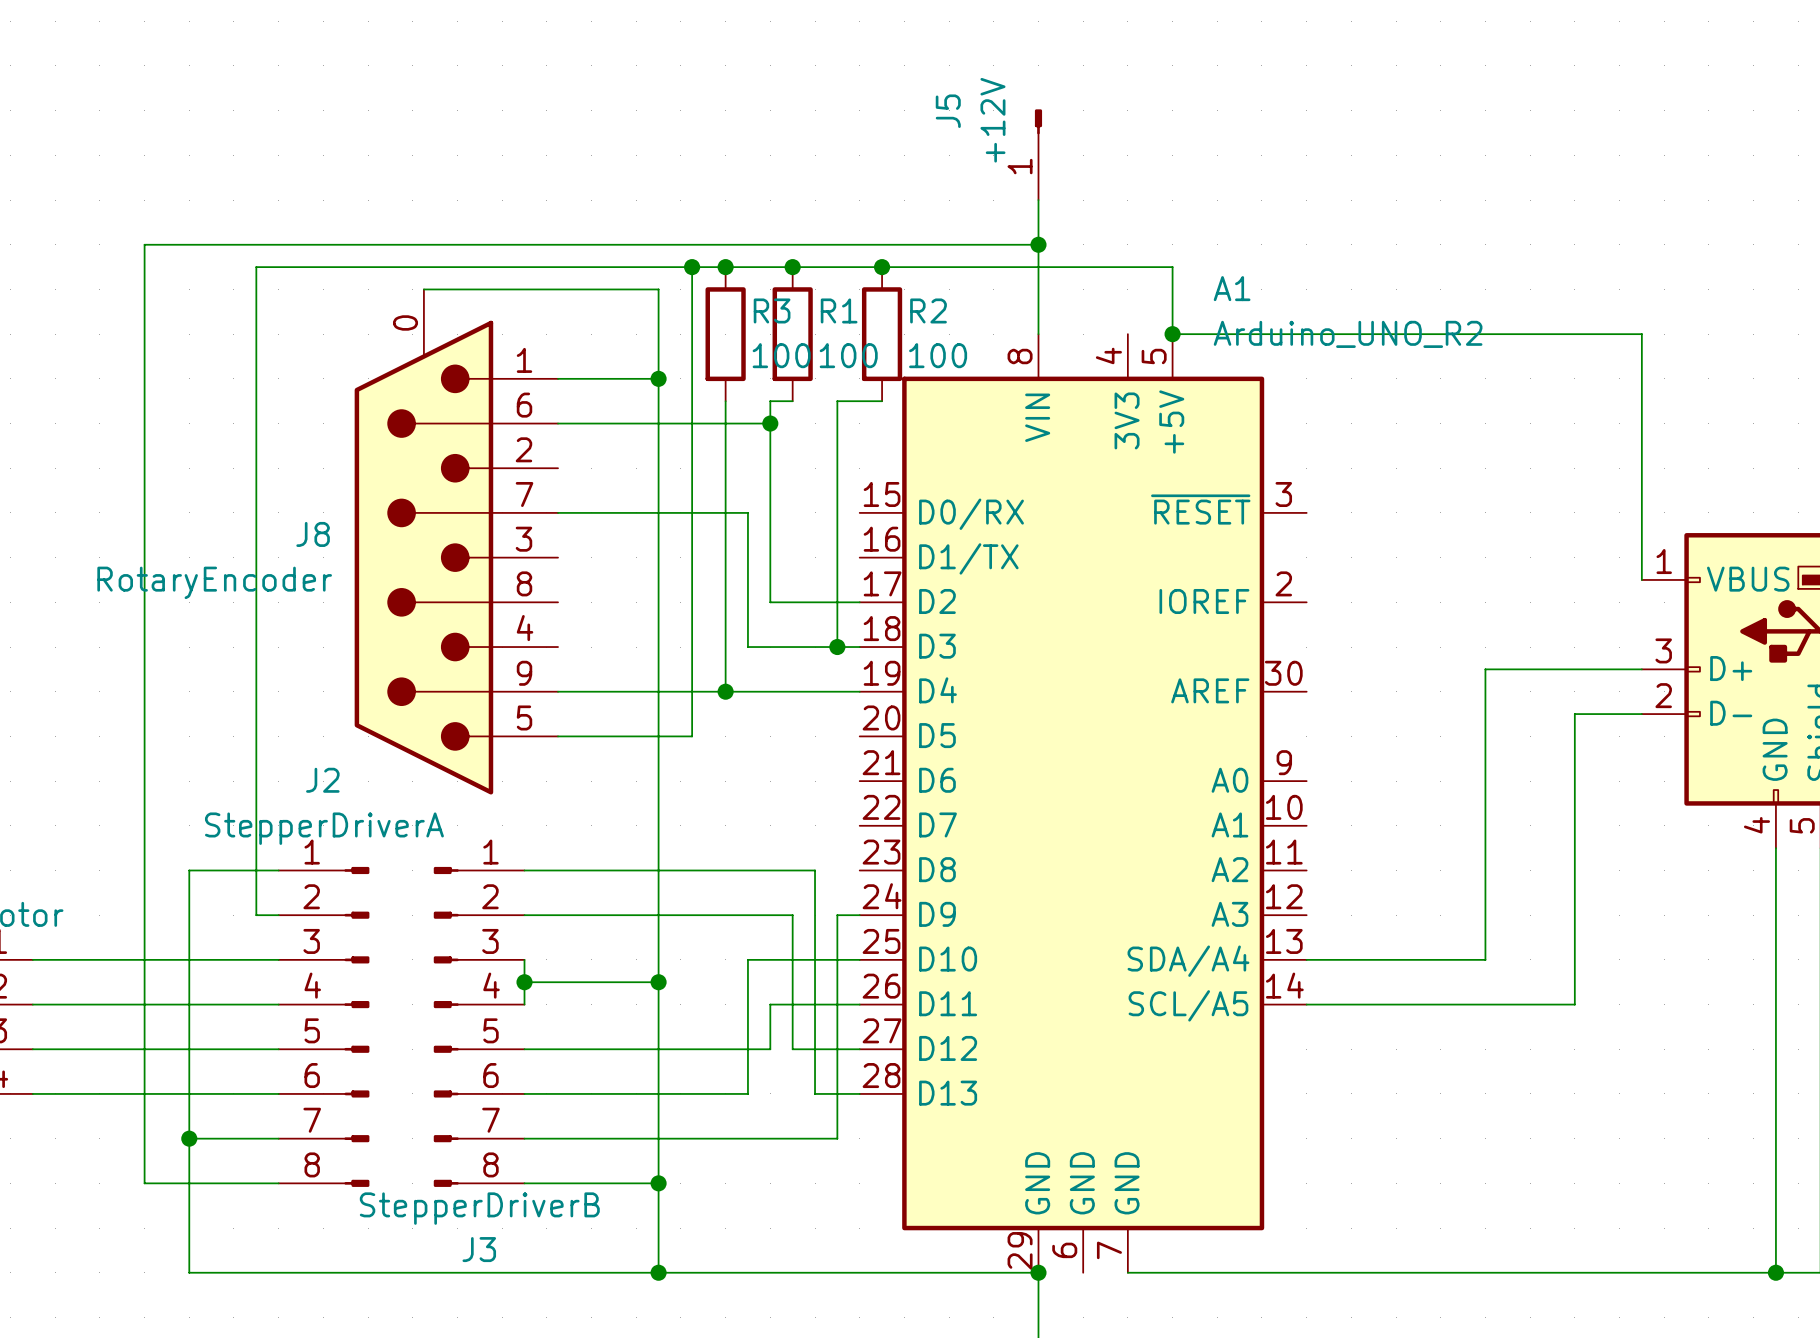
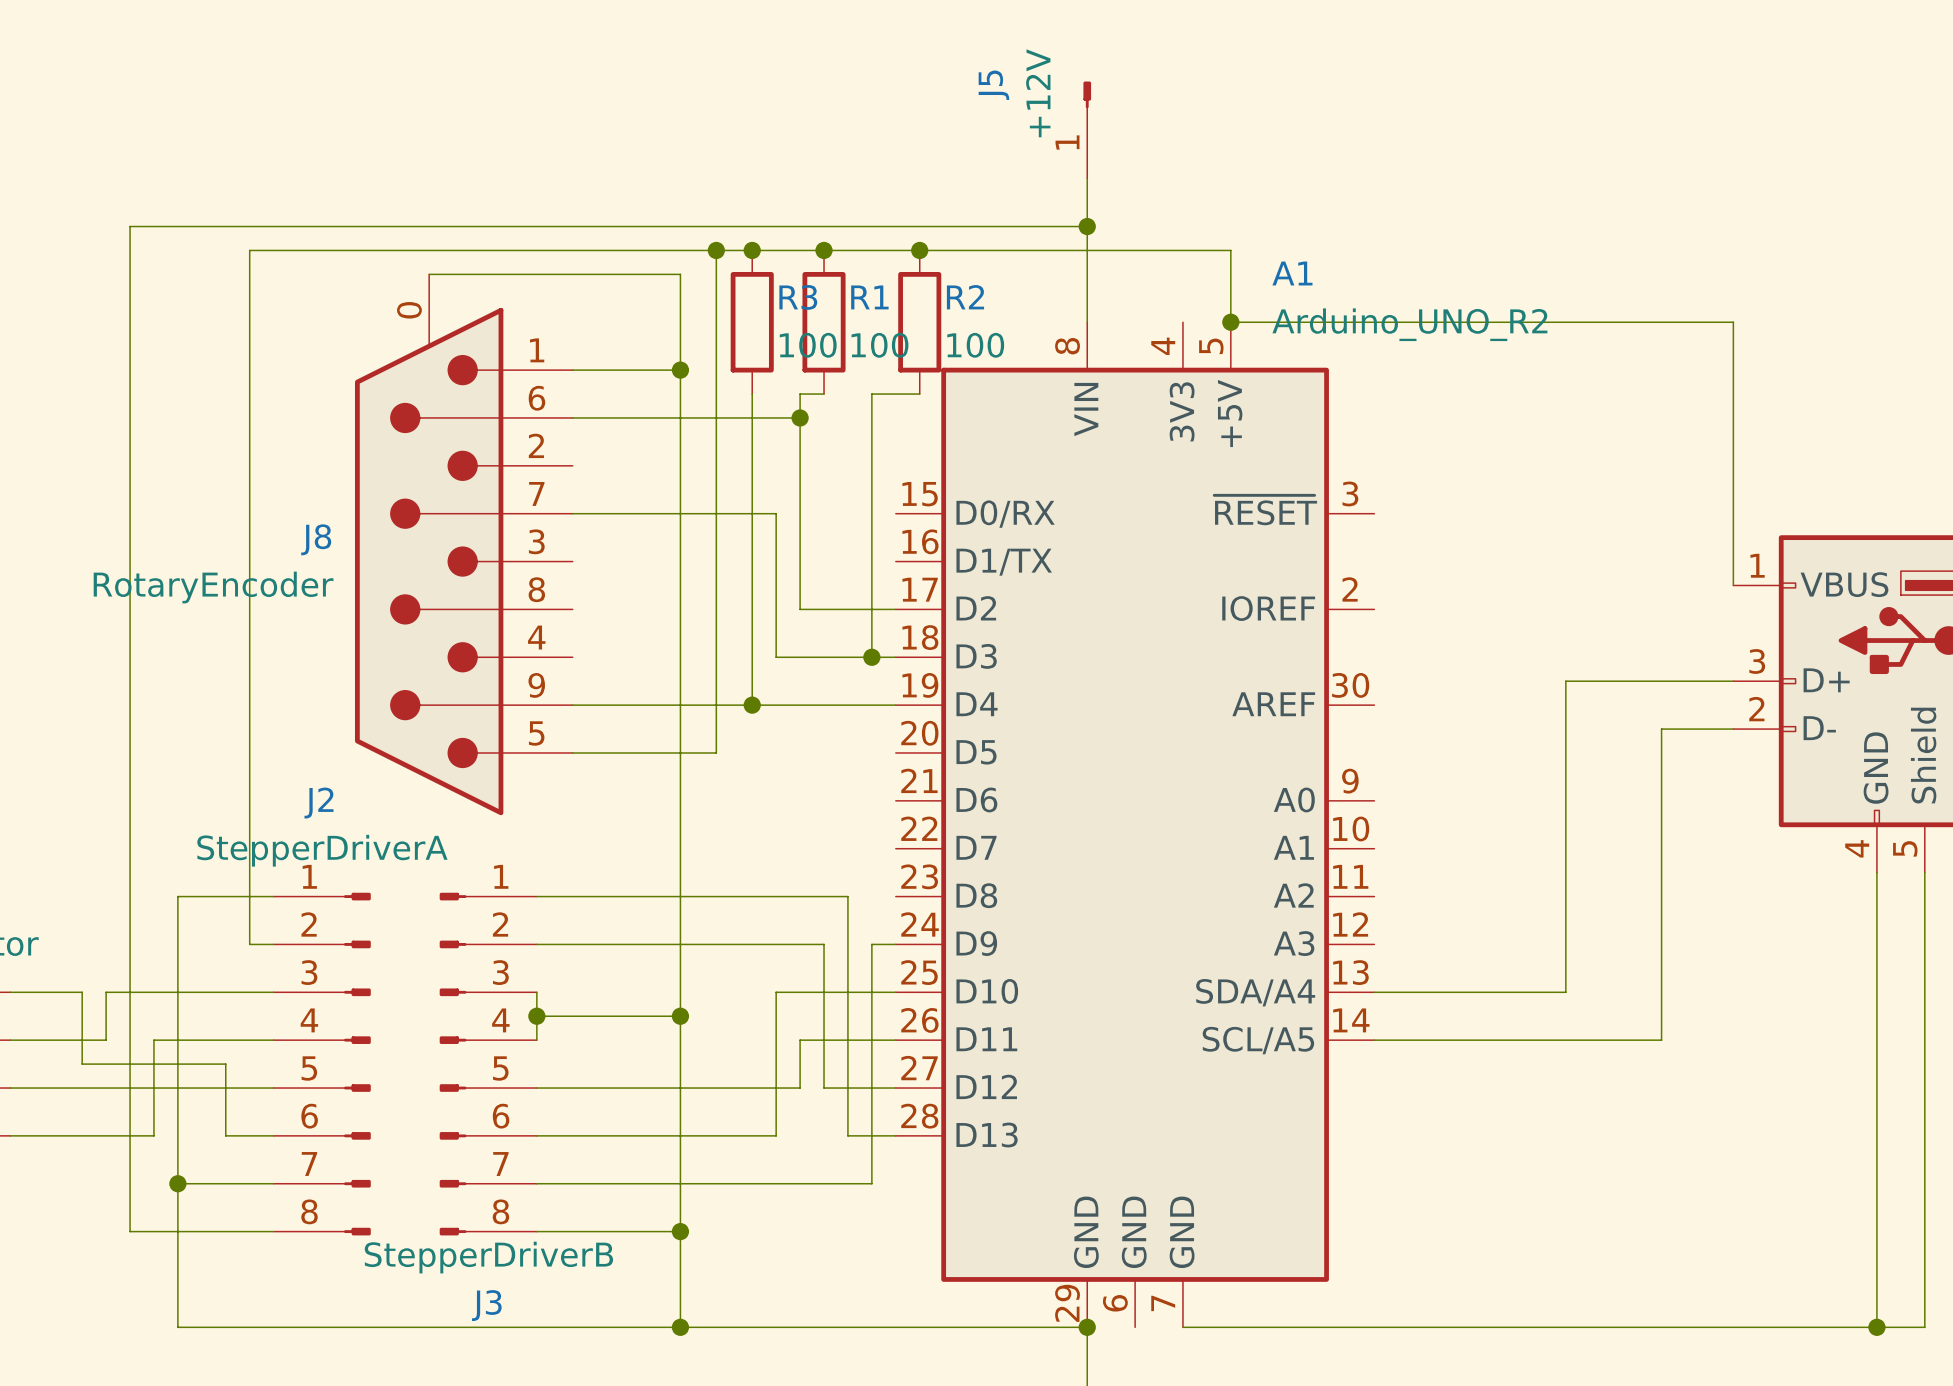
wire: (99, 959) (122, 959) -> (106, 1040) (106, 992)
wire: (122, 1004) (166, 1004) -> (153, 1135) (153, 1040)
wire: (166, 1093) (233, 1093) -> (82, 992) (82, 1064) (225, 1064) (225, 1135)

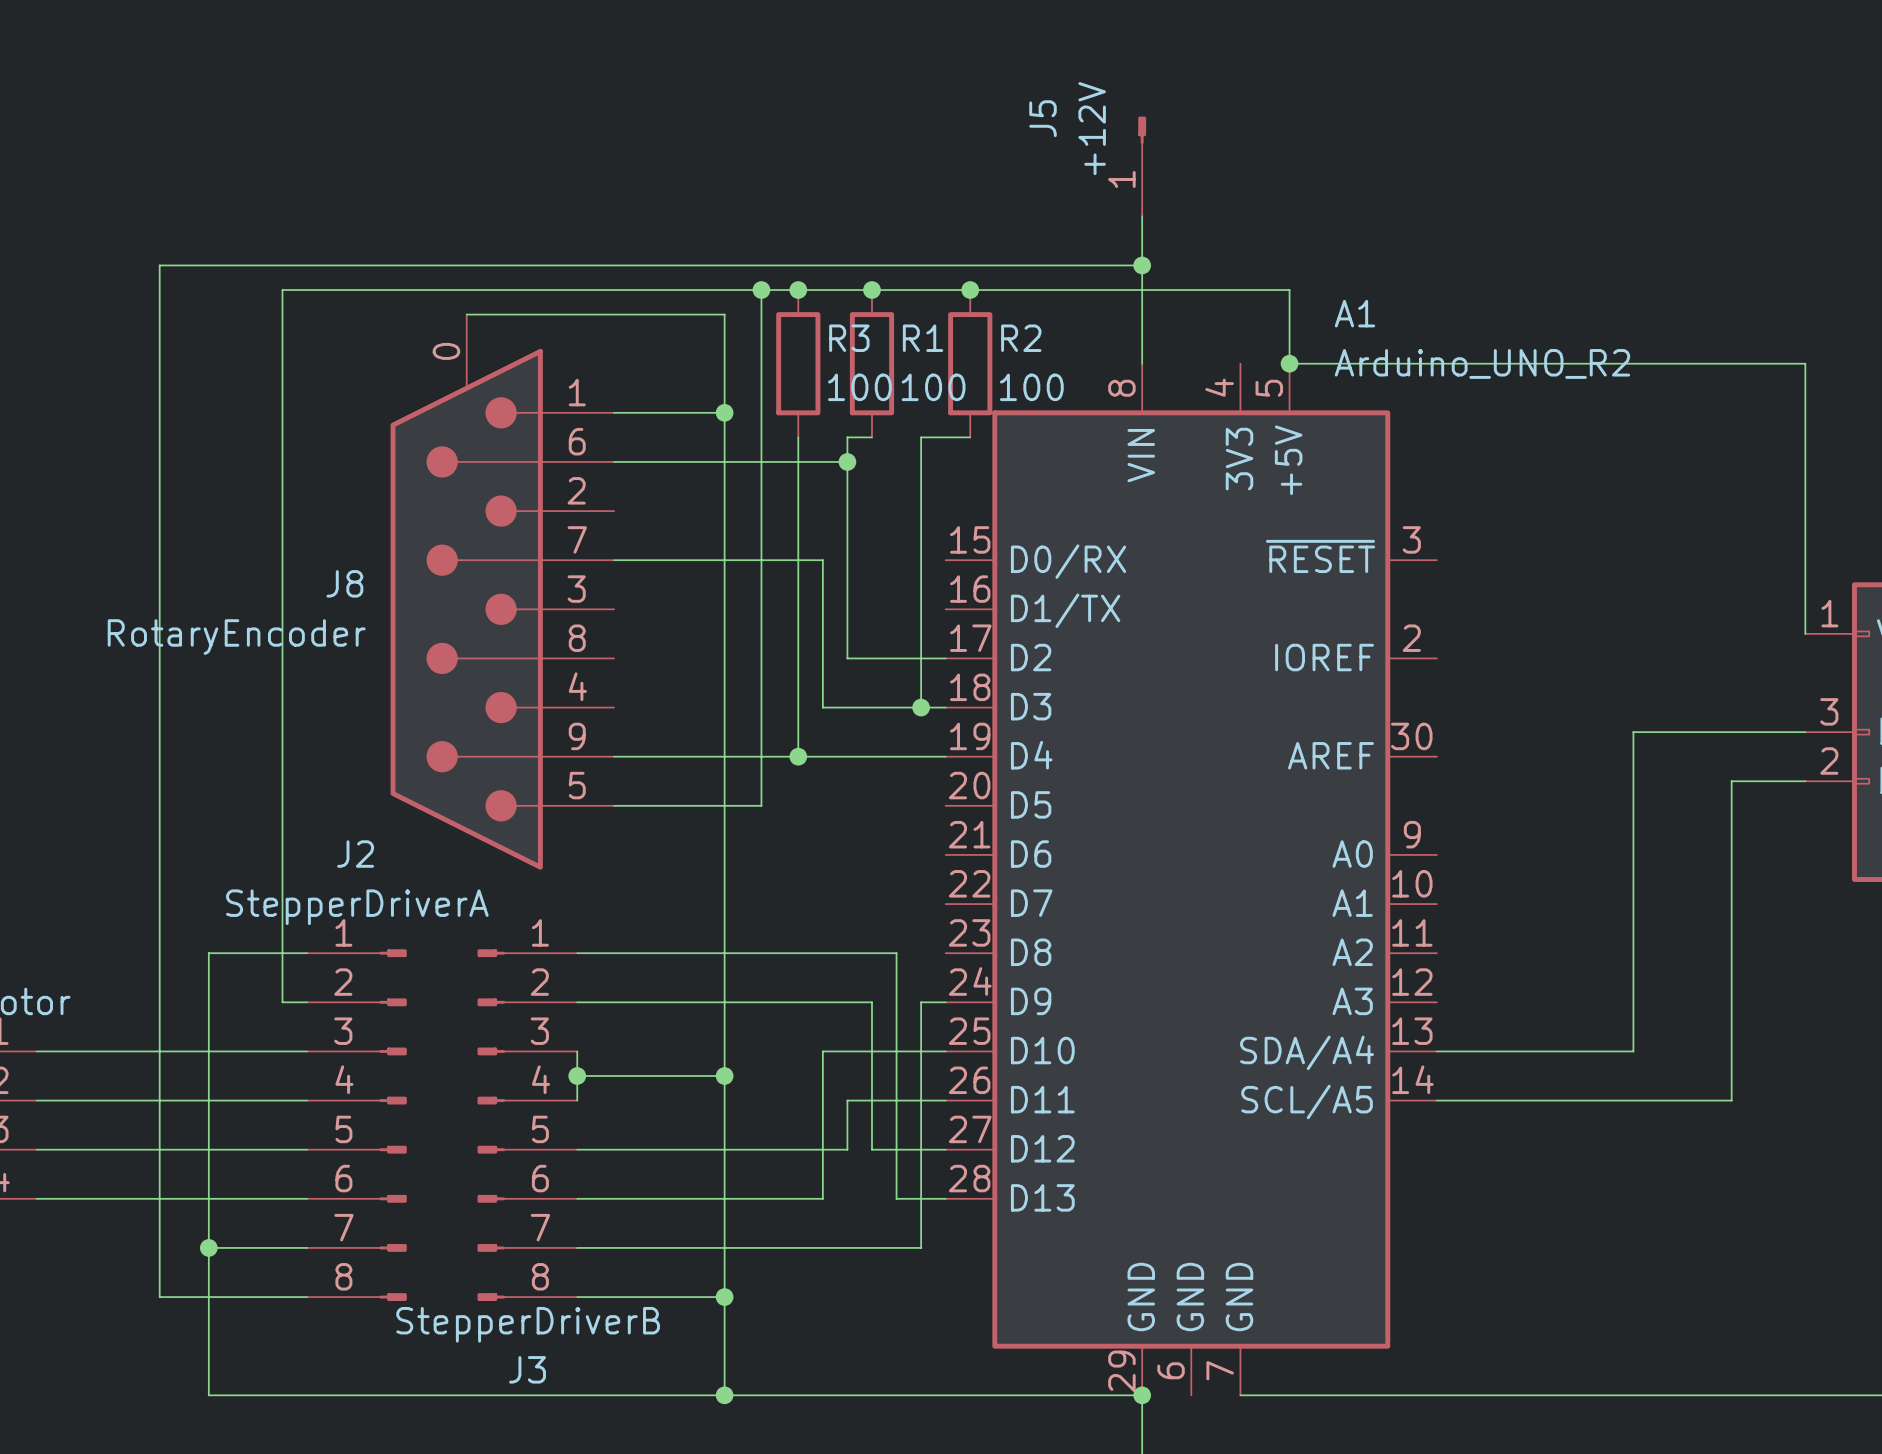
wire: (82, 992) (82, 1064) (225, 1064) (225, 1135) -> (184, 1198) (257, 1198)
wire: (106, 992) (106, 1040) -> (135, 1051) (110, 1051)
wire: (153, 1040) (153, 1135) -> (184, 1100) (135, 1100)

